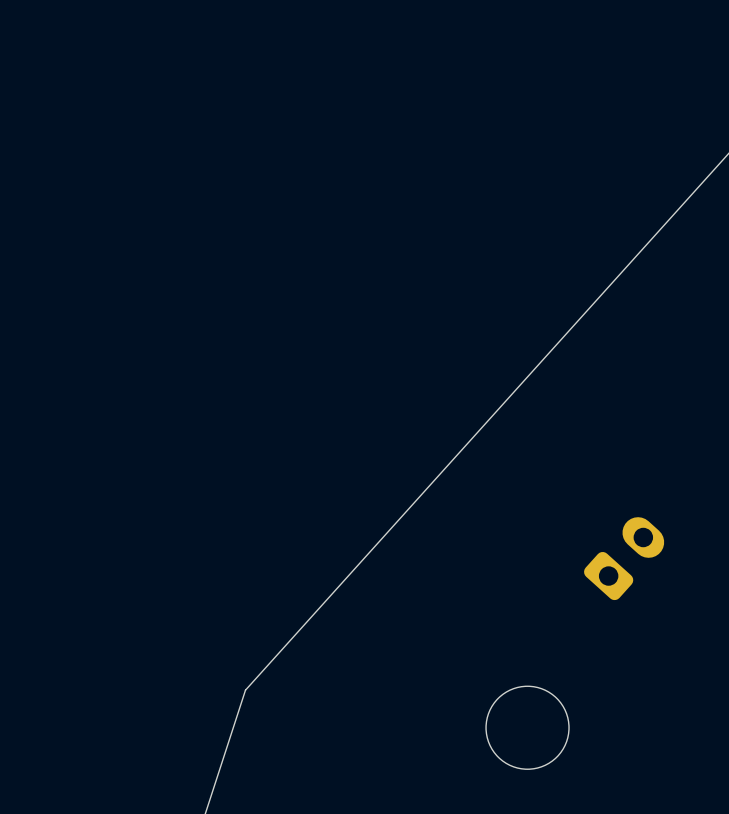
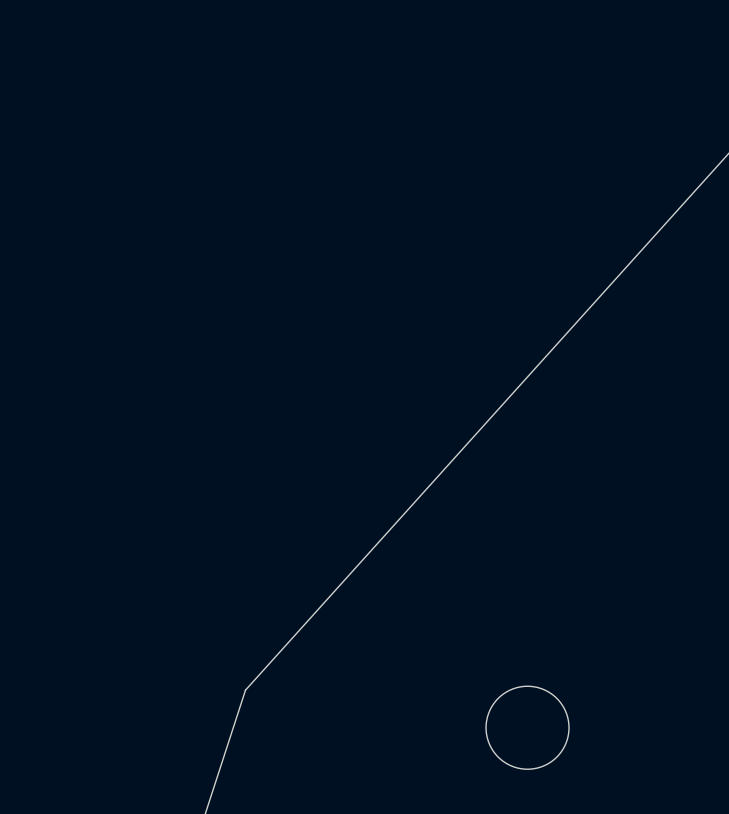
part: (624, 558) -> none

